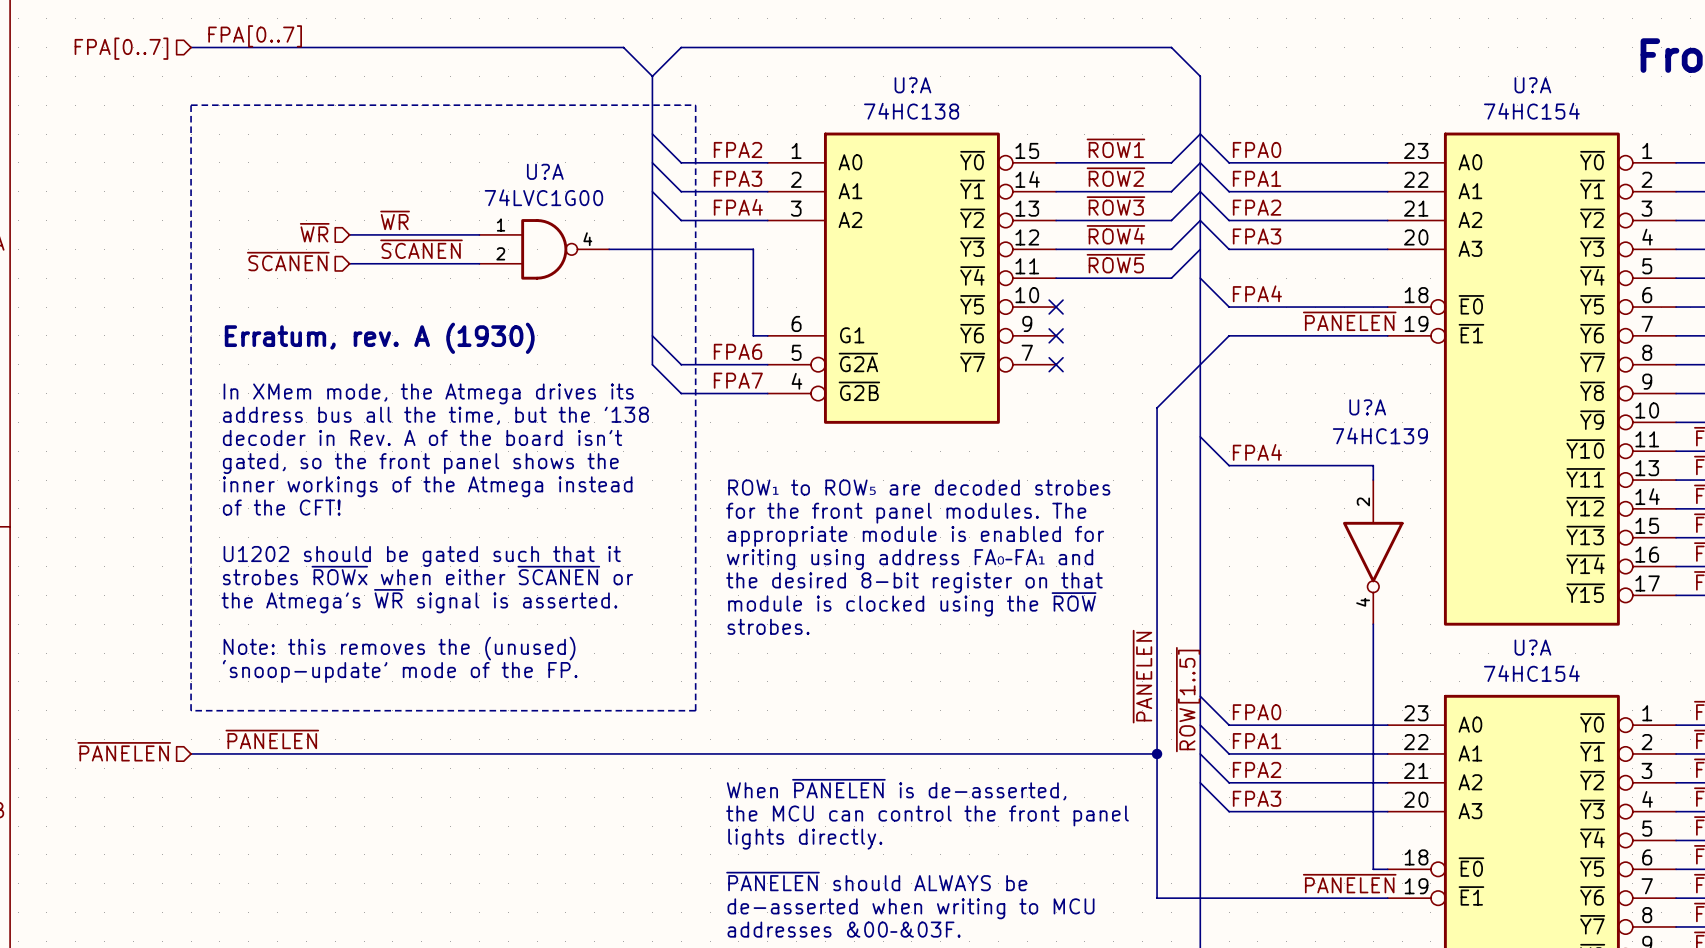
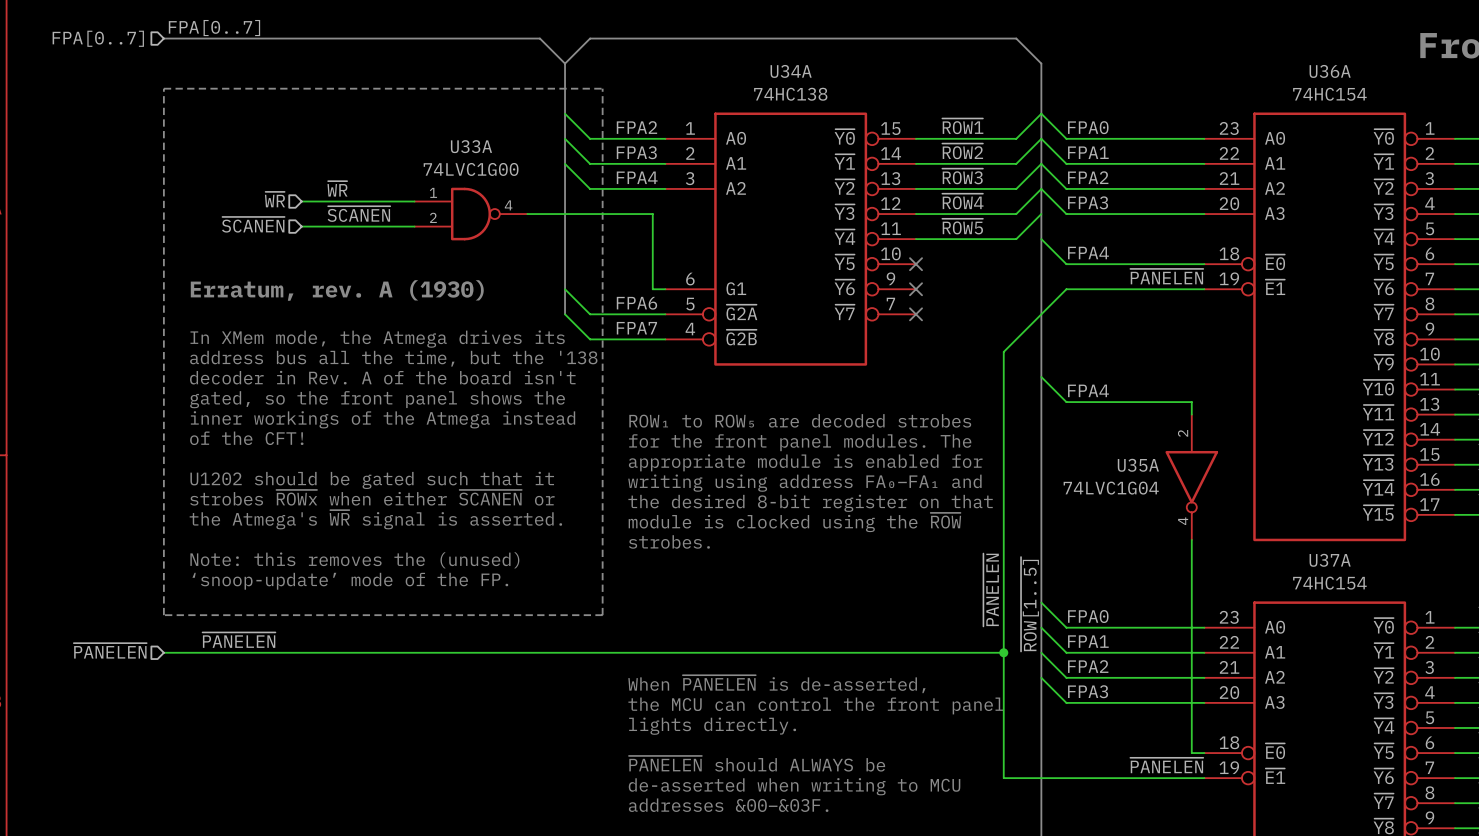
U?A name: U?A (912, 85) -> U34A (791, 71)
U?A name: U?A (1532, 85) -> U36A (1330, 71)
U?A name: U?A (545, 171) -> U33A (471, 146)
U?A name: U?A (1367, 407) -> U35A (1138, 465)
U?A value: 74HC139 (1380, 435) -> 74LVC1G04 (1111, 488)
U?A name: U?A (1532, 647) -> U37A (1330, 560)

